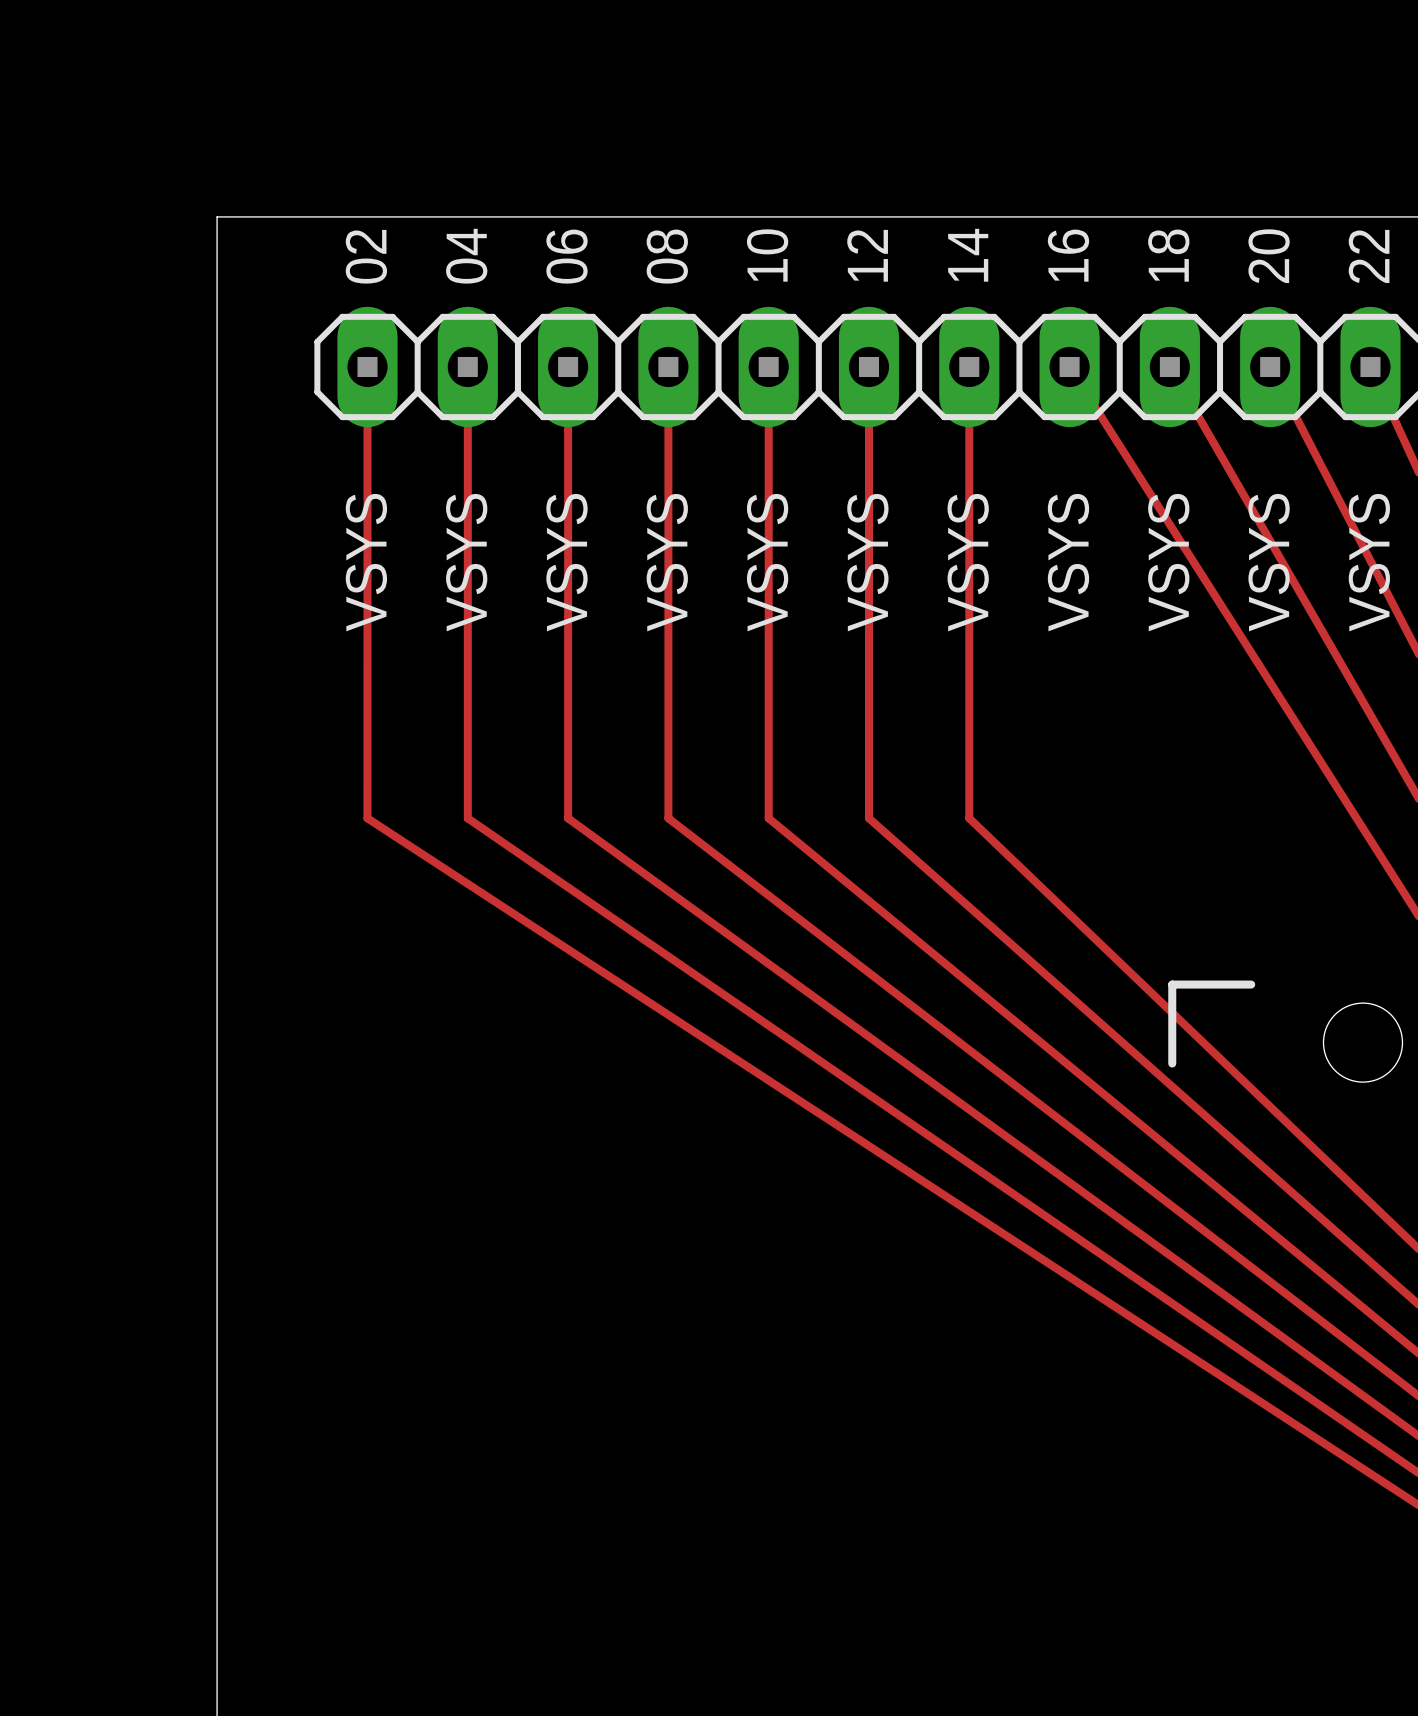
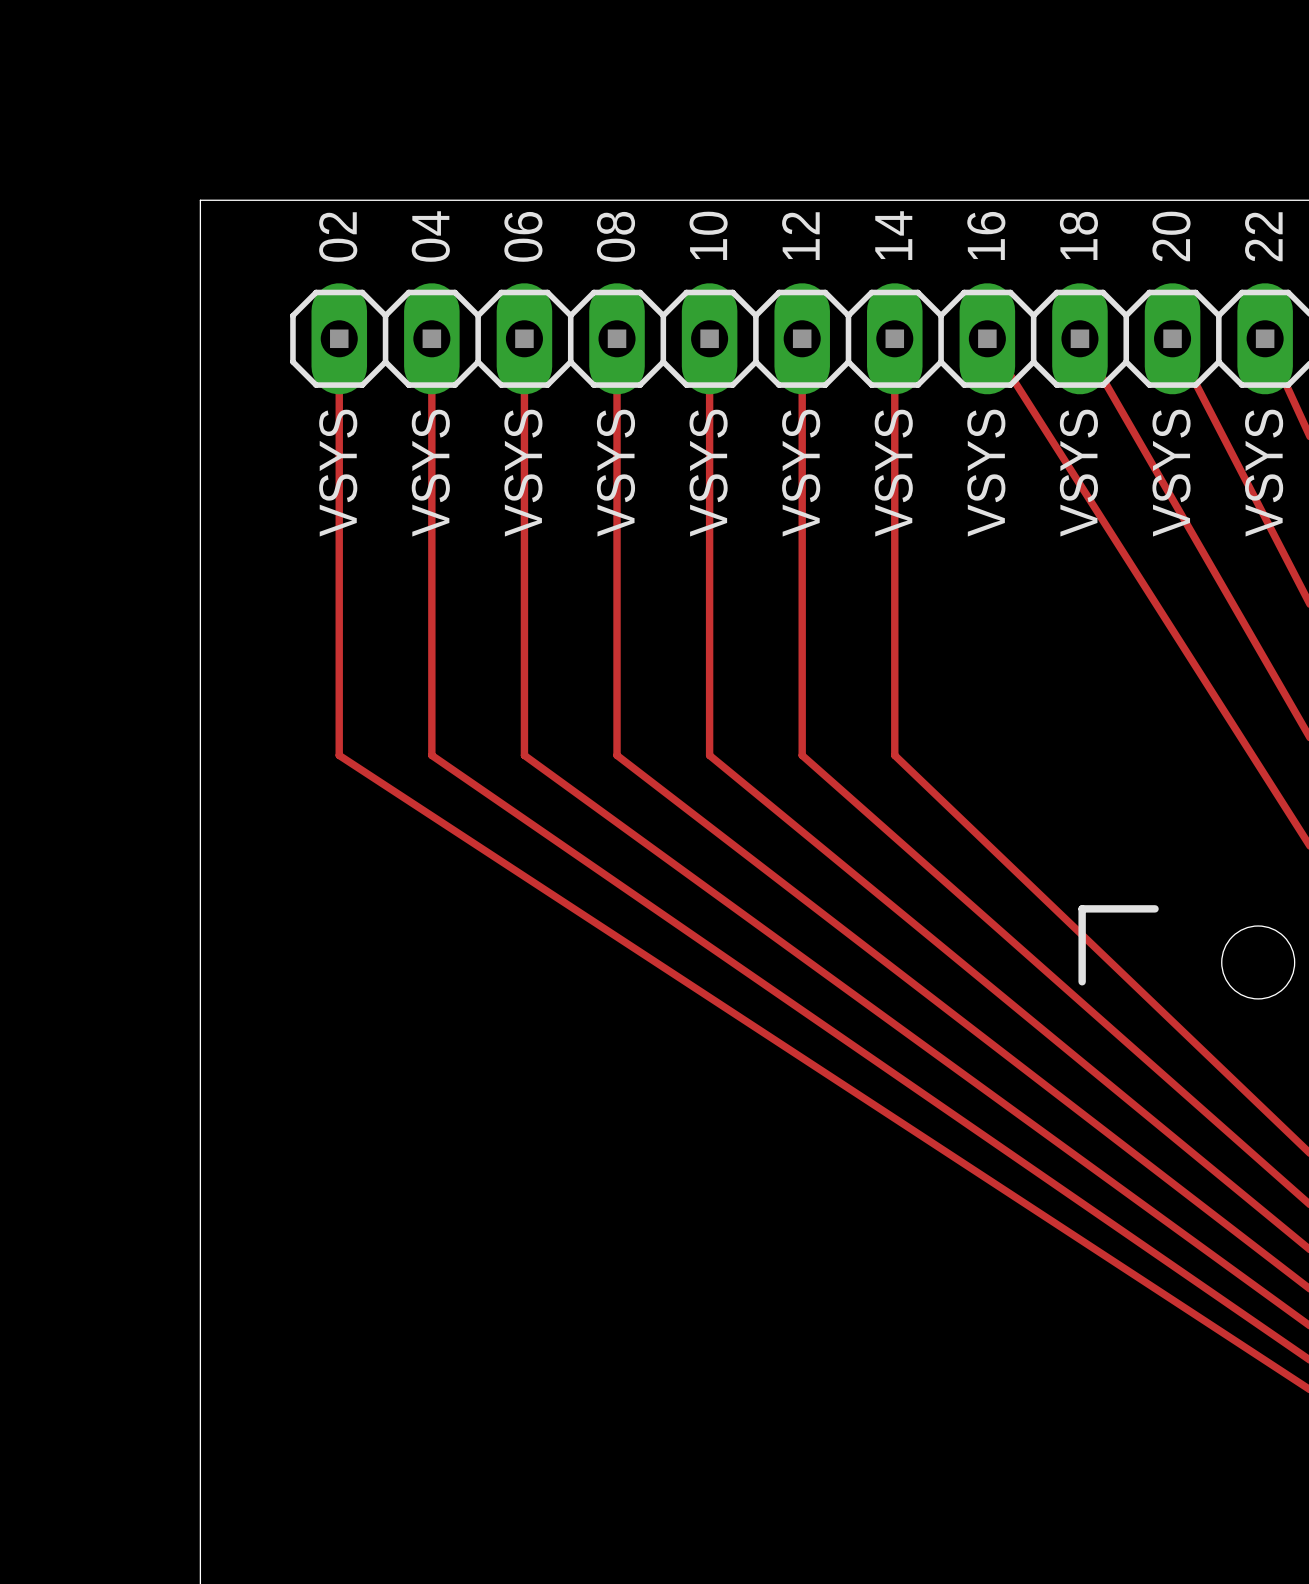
text position: VSYS (366, 562) -> VSYS (338, 473)
text position: VSYS (466, 562) -> VSYS (430, 473)
text position: VSYS (566, 562) -> VSYS (523, 473)
text position: VSYS (667, 562) -> VSYS (615, 473)
text position: VSYS (767, 562) -> VSYS (708, 473)
text position: VSYS (867, 562) -> VSYS (801, 473)
text position: VSYS (968, 562) -> VSYS (893, 473)
text position: VSYS (1068, 562) -> VSYS (986, 473)
text position: VSYS (1168, 562) -> VSYS (1078, 473)
text position: VSYS (1269, 562) -> VSYS (1171, 473)
text position: VSYS (1369, 562) -> VSYS (1264, 473)

